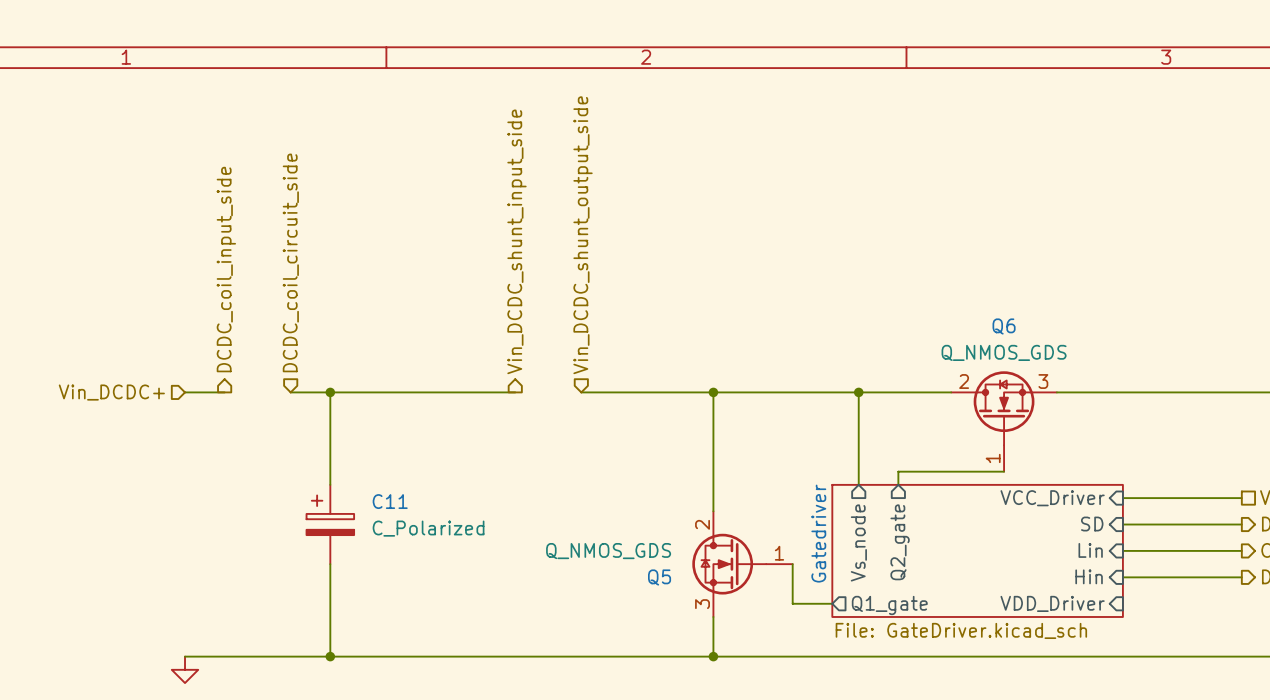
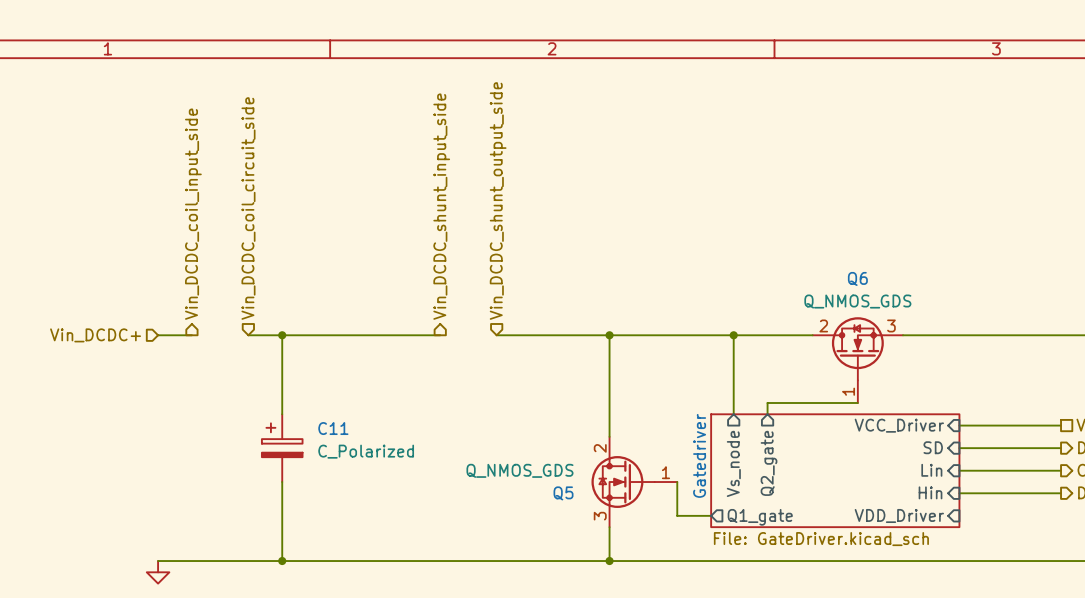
hierarchical label: DCDC_coil_circuit_side (290, 262) -> Vin_DCDC_coil_circuit_side (248, 208)
hierarchical label: DCDC_coil_input_side (226, 269) -> Vin_DCDC_coil_input_side (193, 214)

